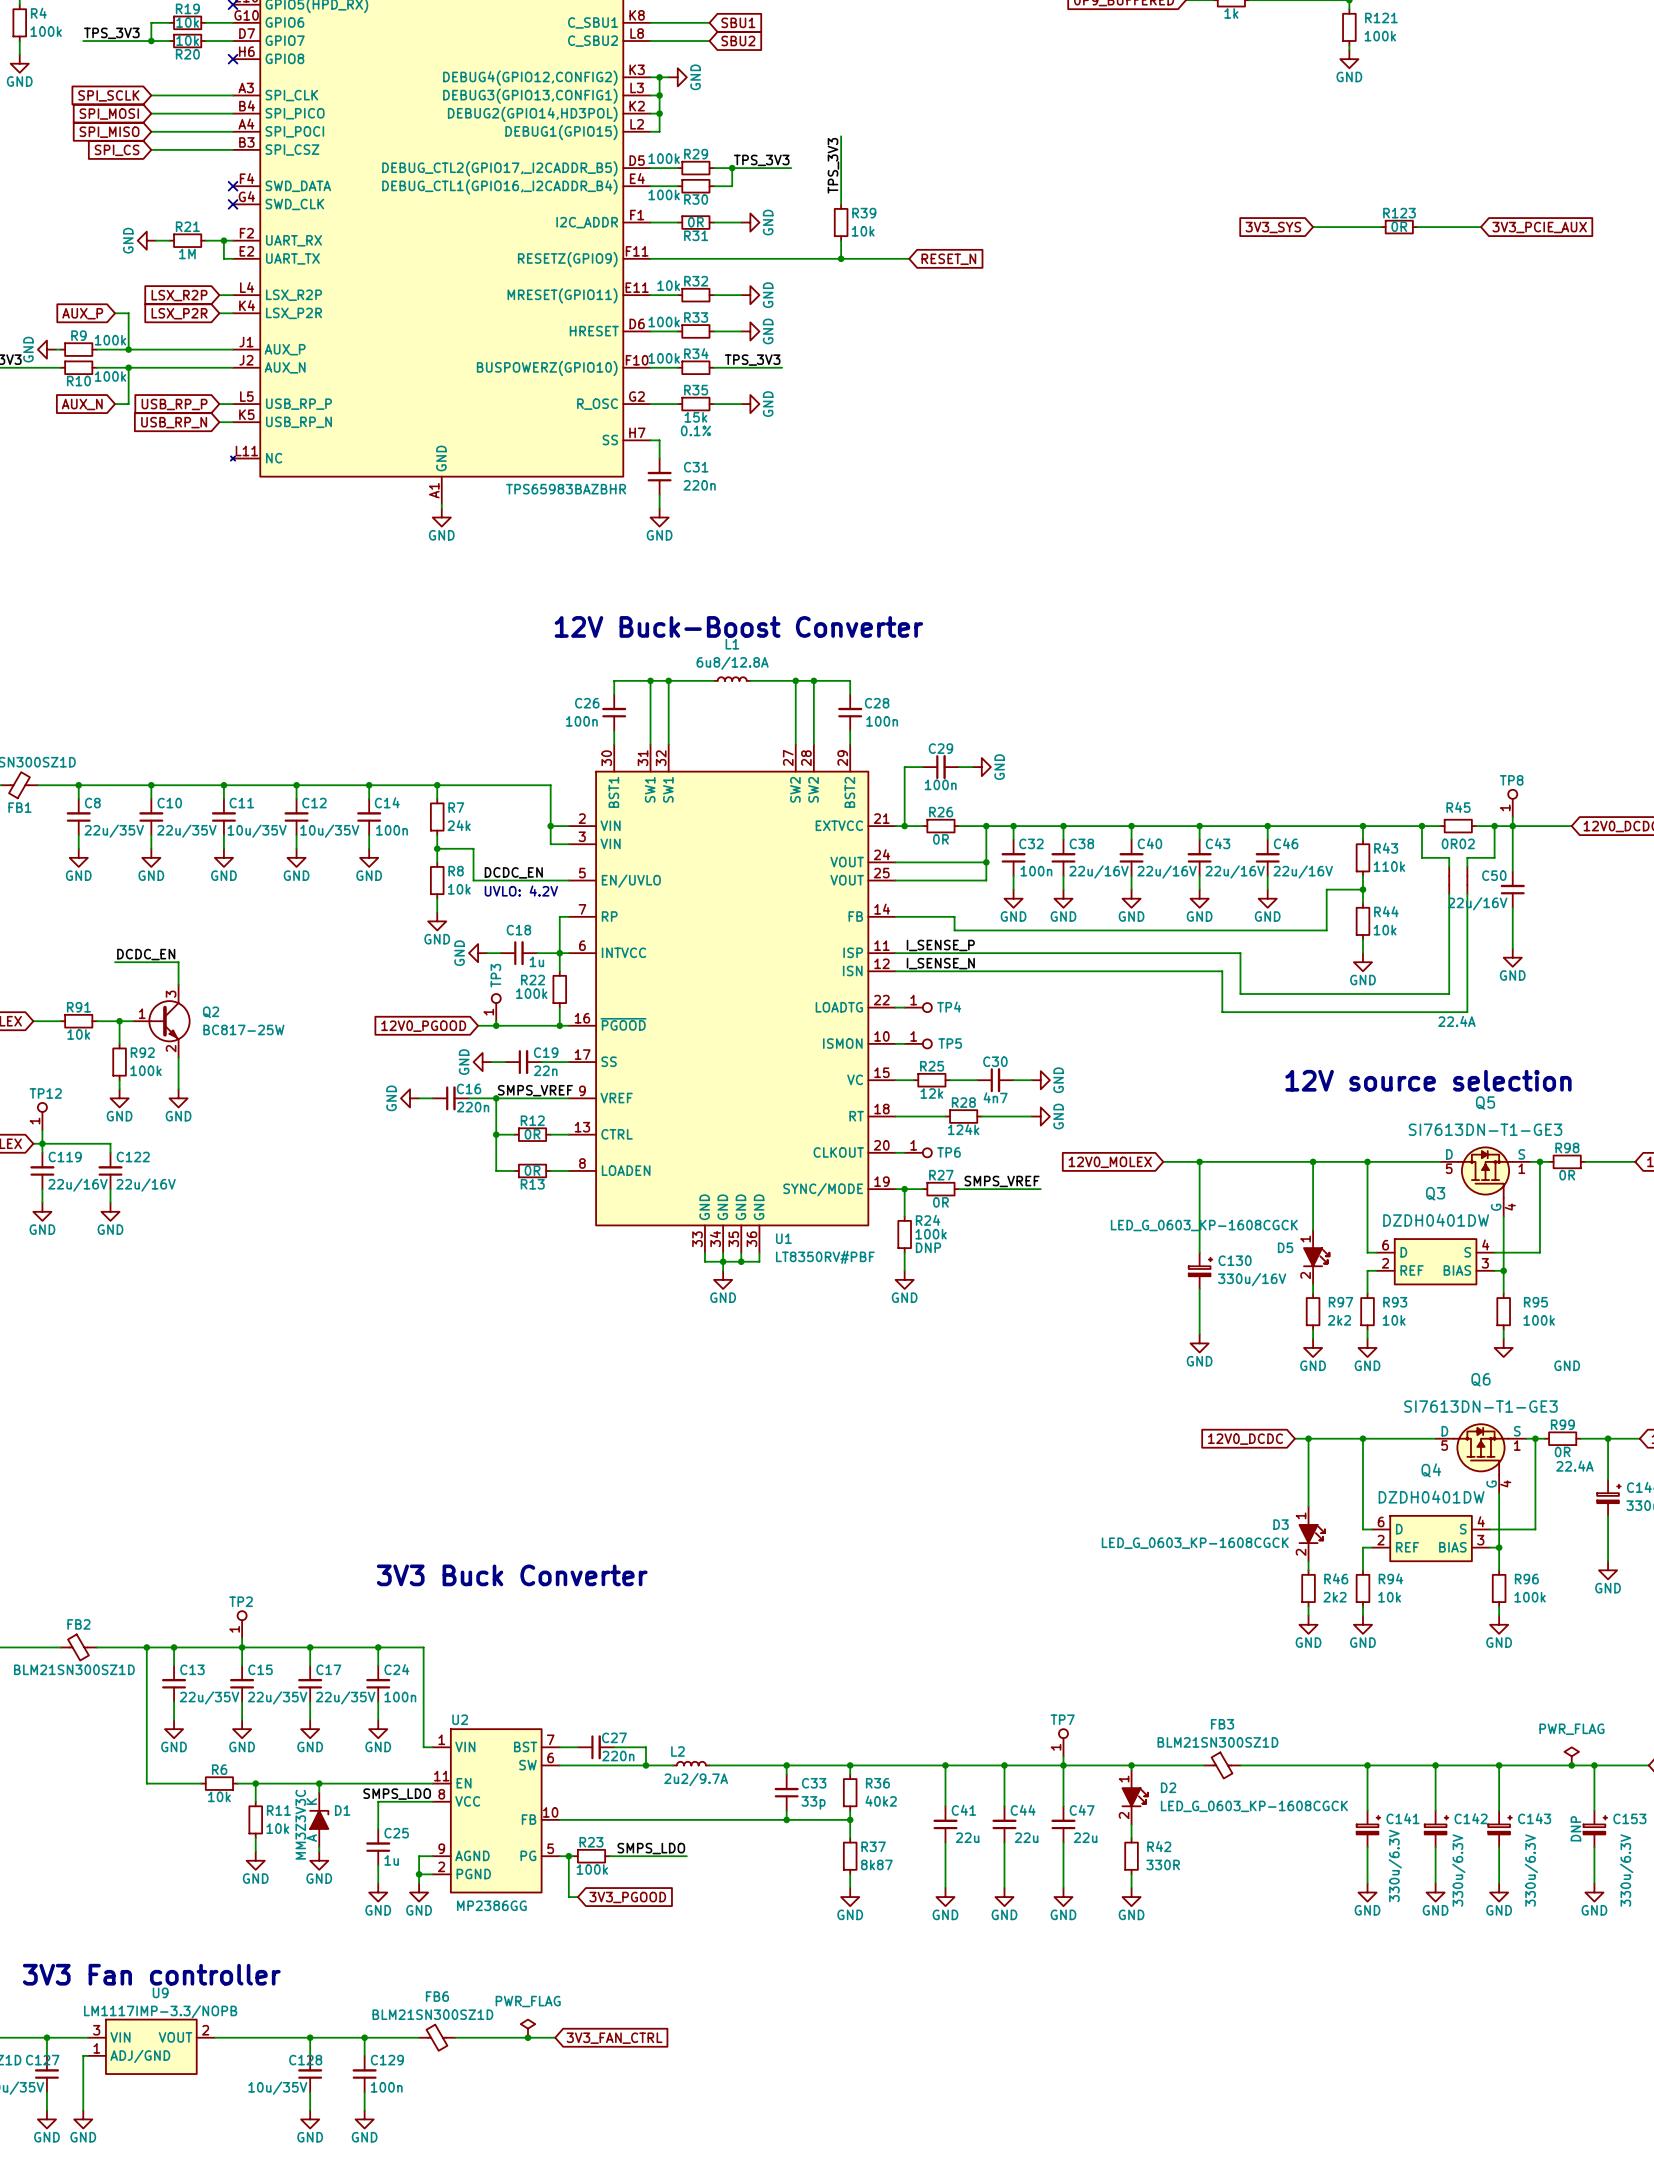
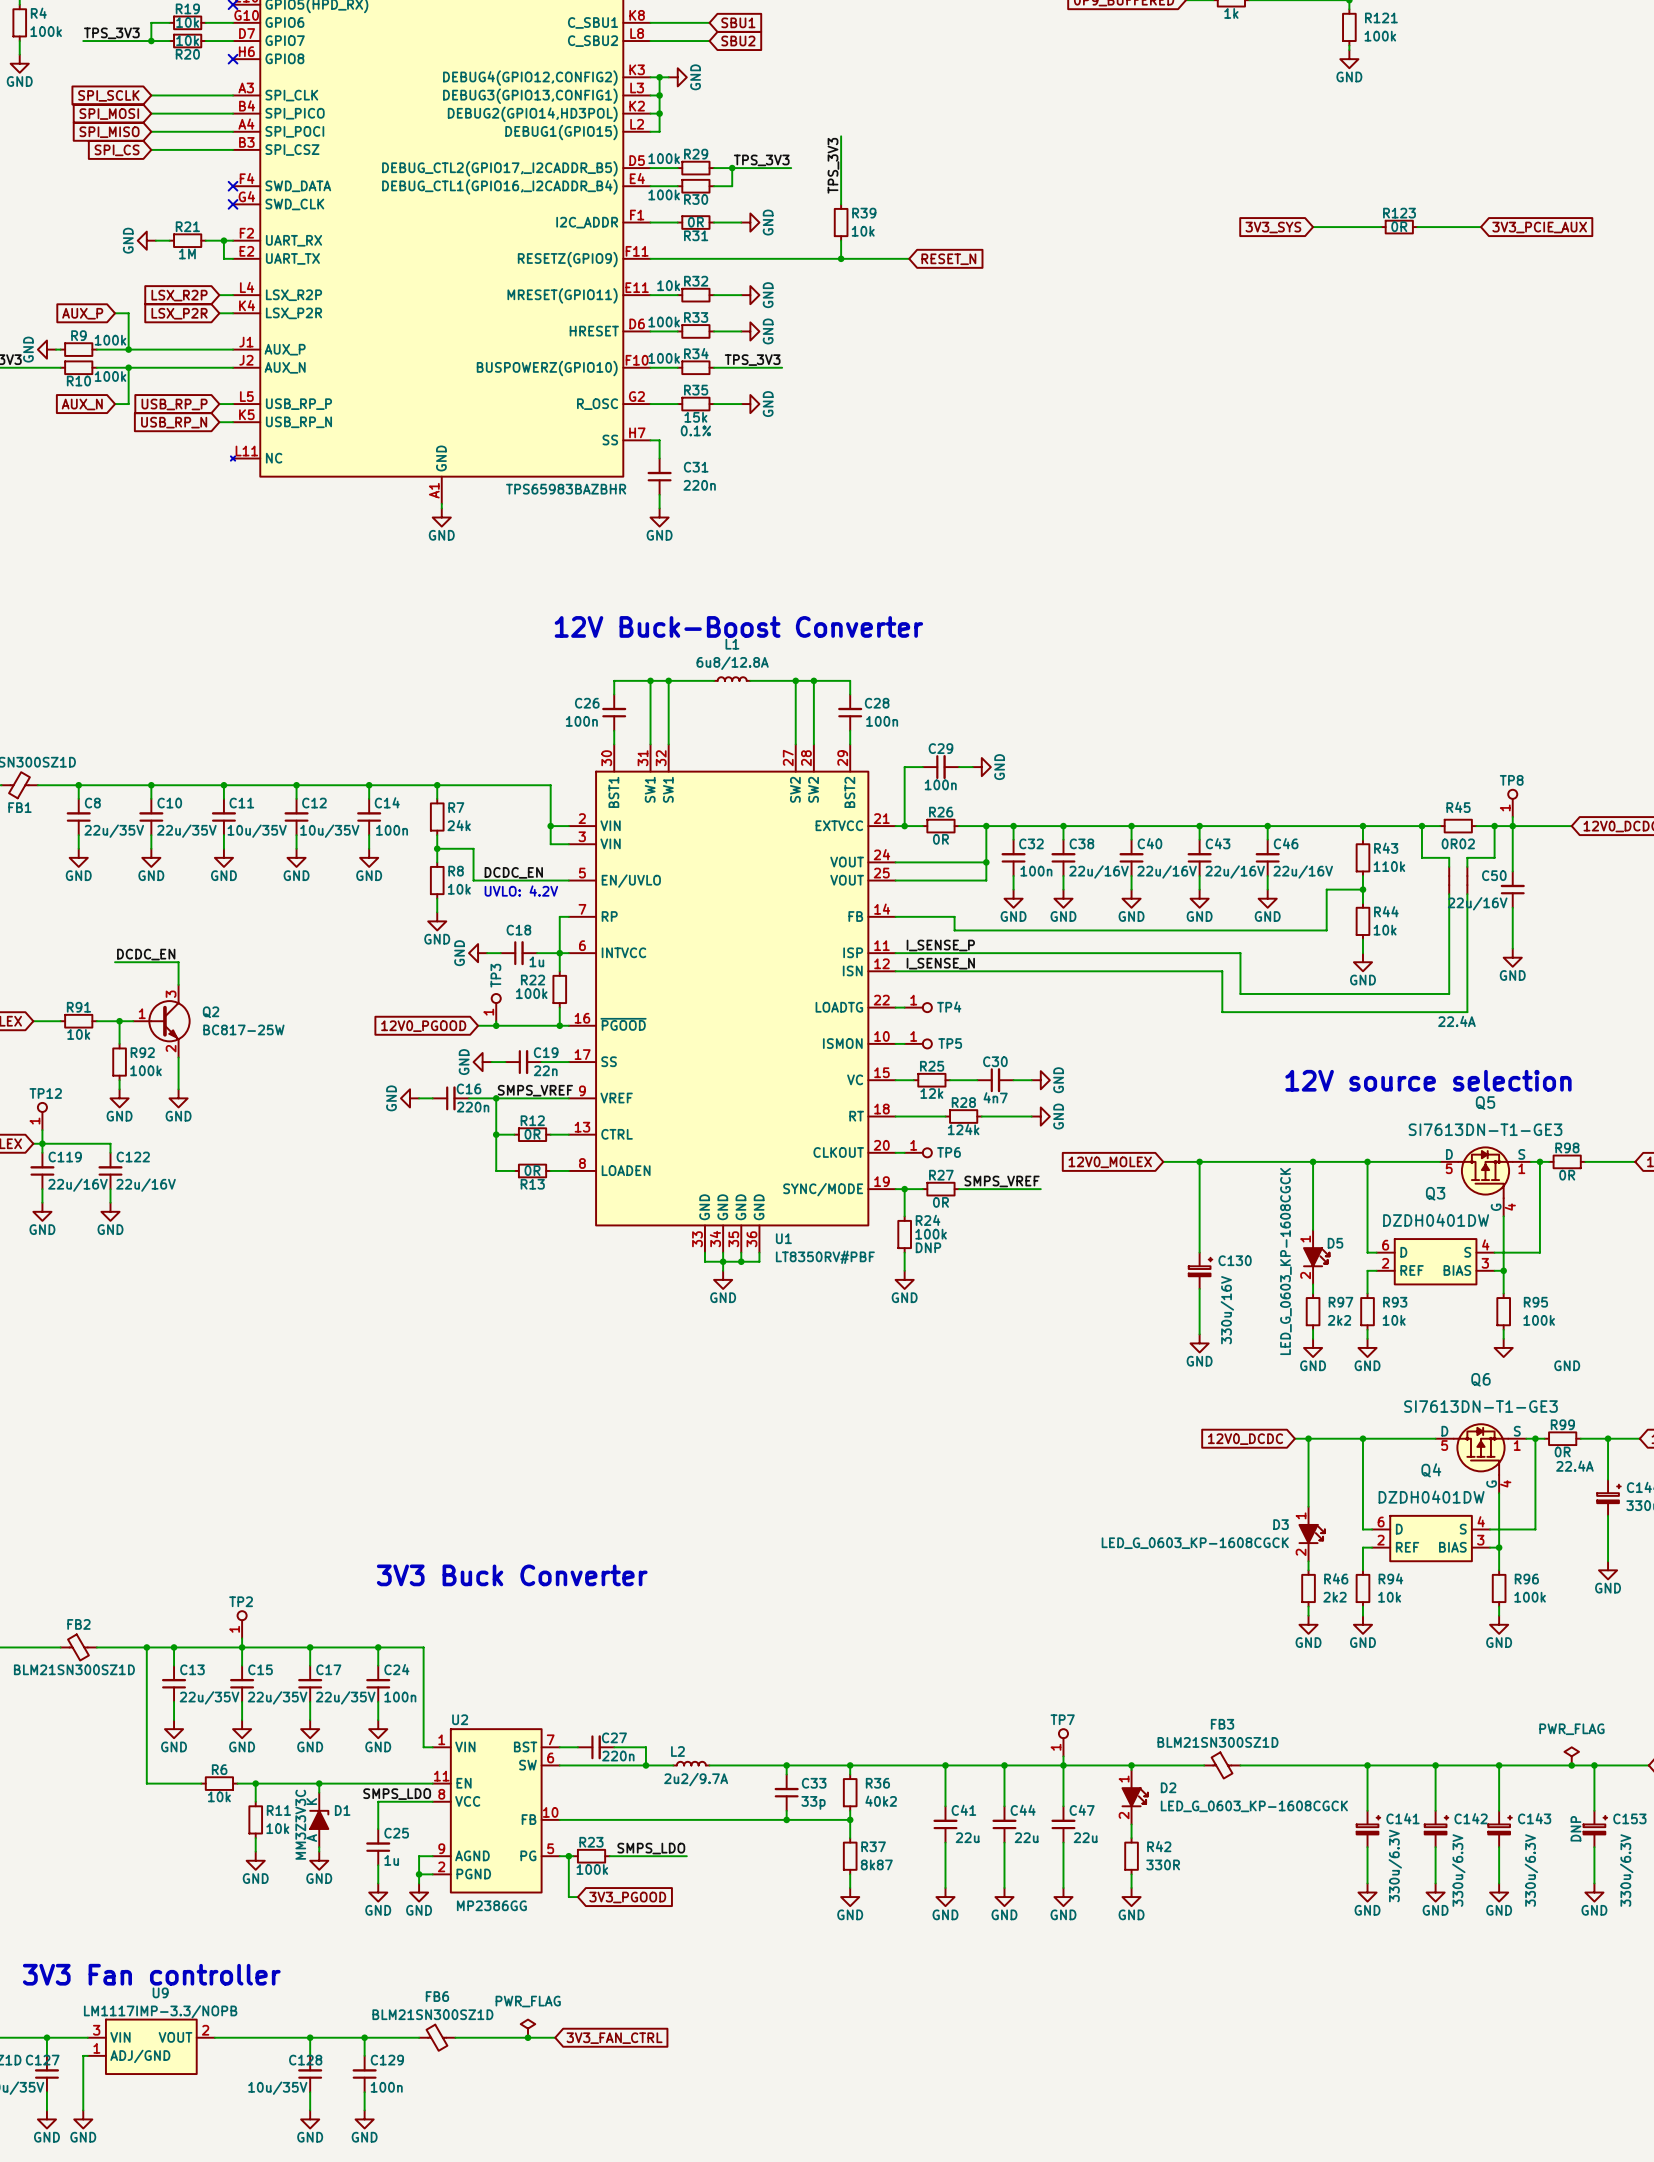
D5 value rotation: 0° (1204, 1225) -> 90° counterclockwise (1285, 1261)
D5 name position: D5 (1285, 1247) -> D5 (1335, 1243)
C130 text rotation: 0° (1252, 1279) -> 90° counterclockwise (1227, 1310)

